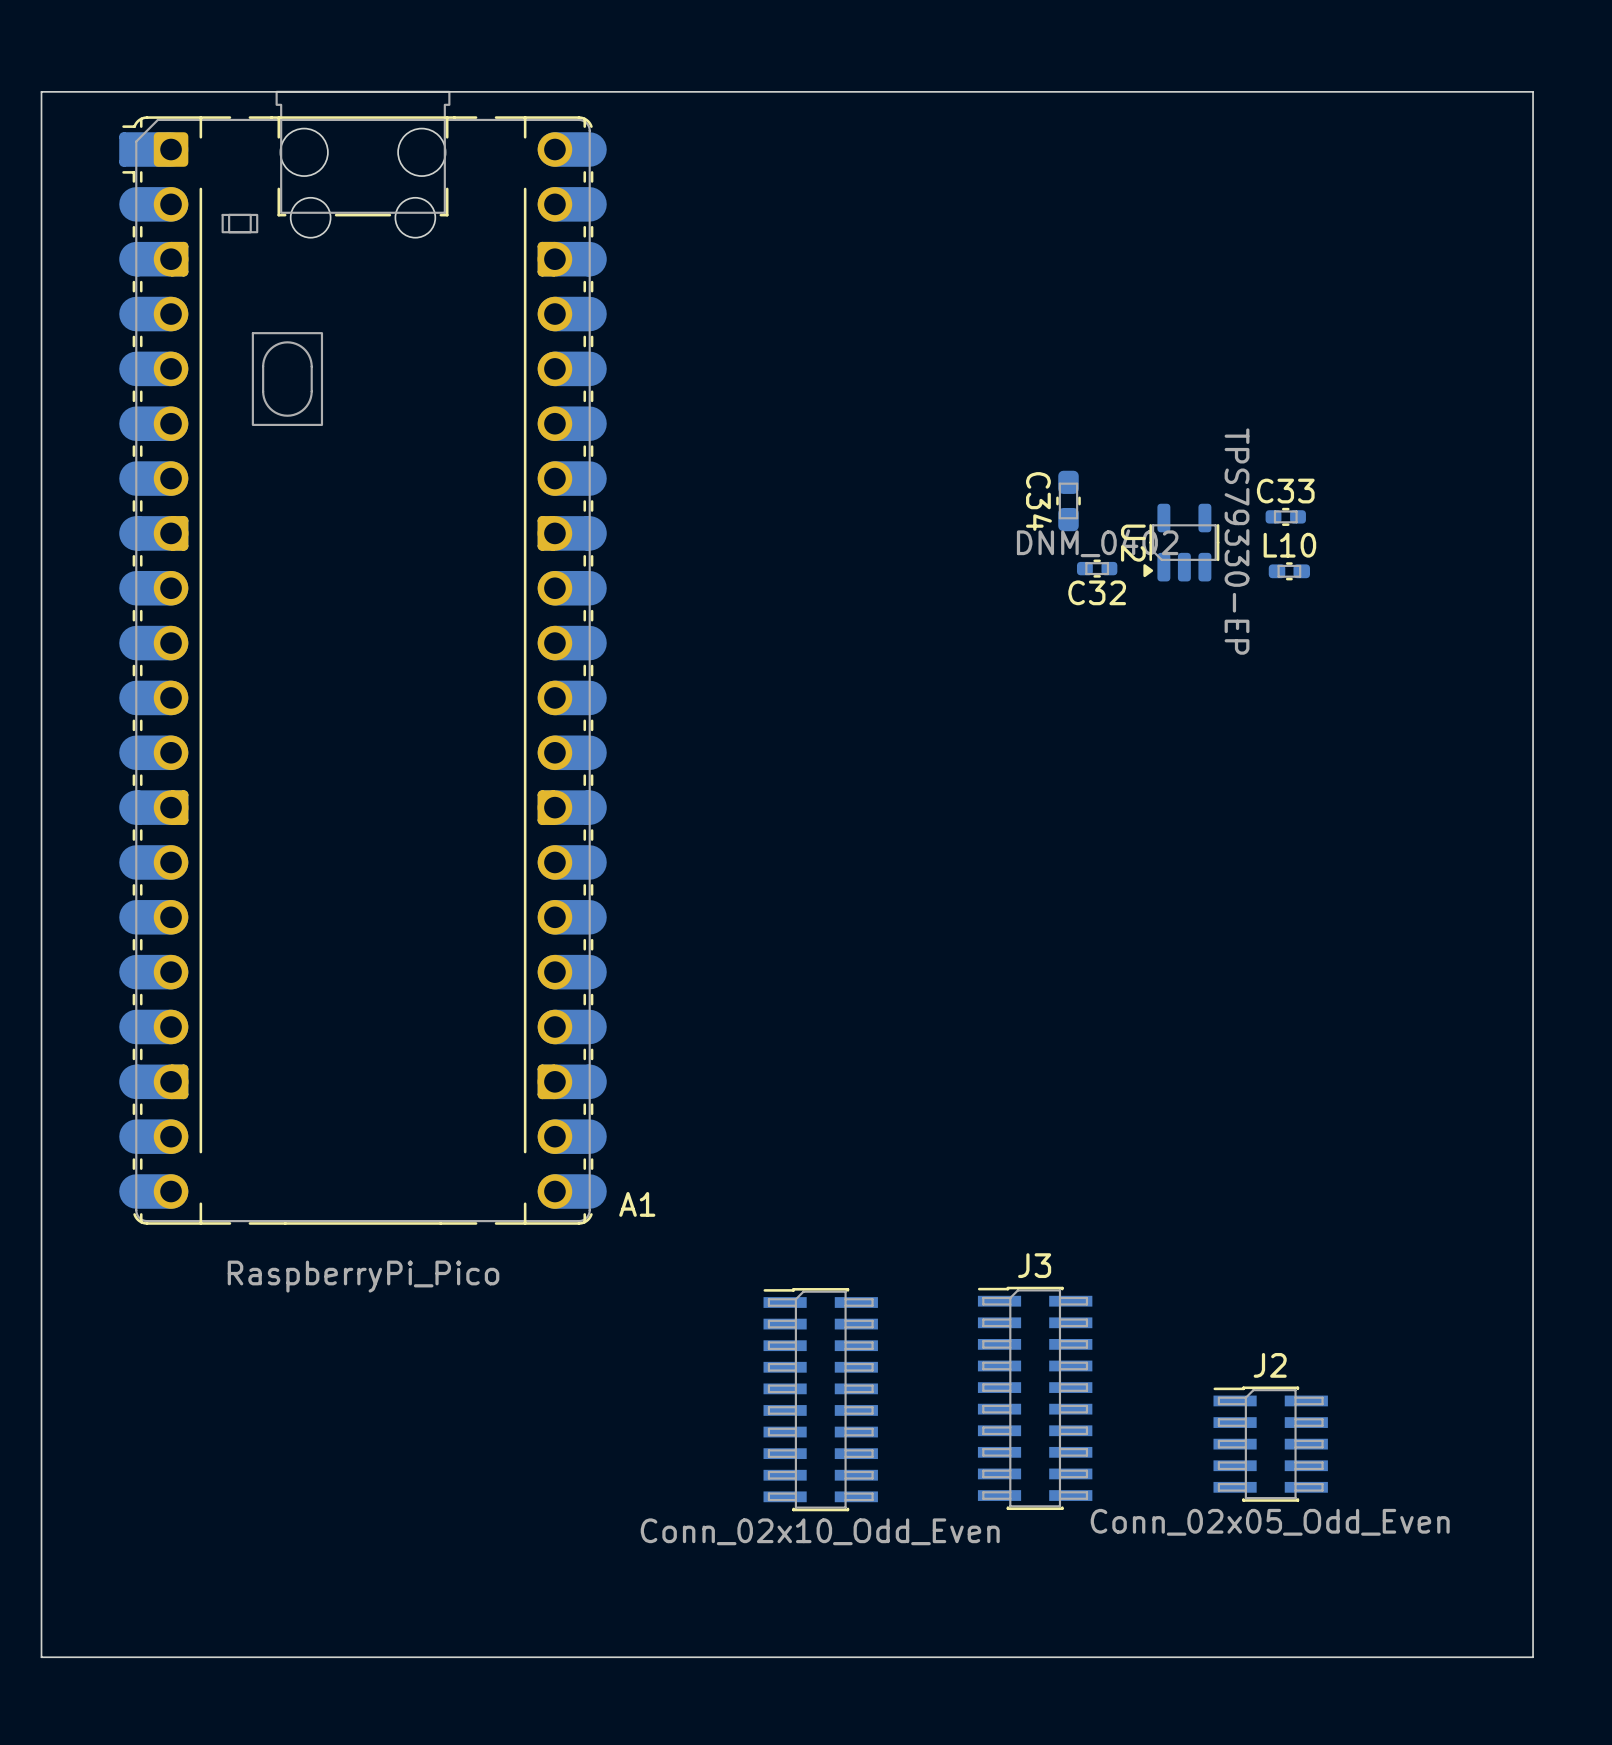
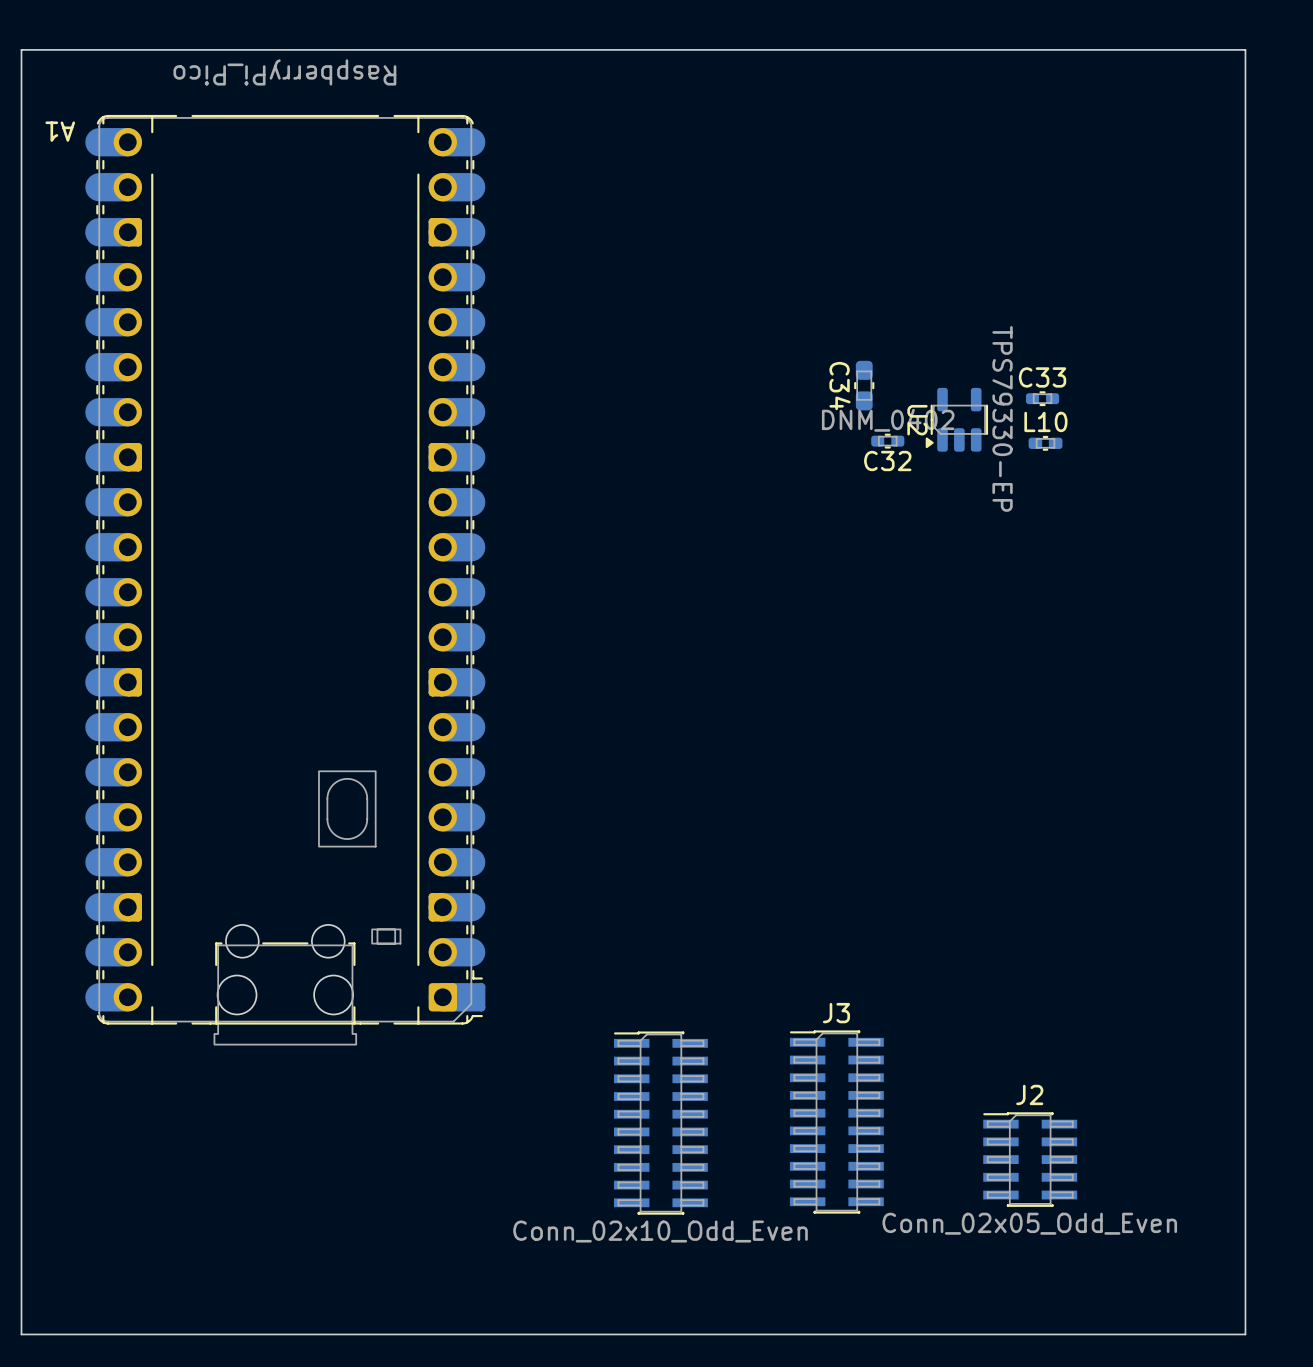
A1 rotation: 0° (363, 657) -> 180° (285, 580)

